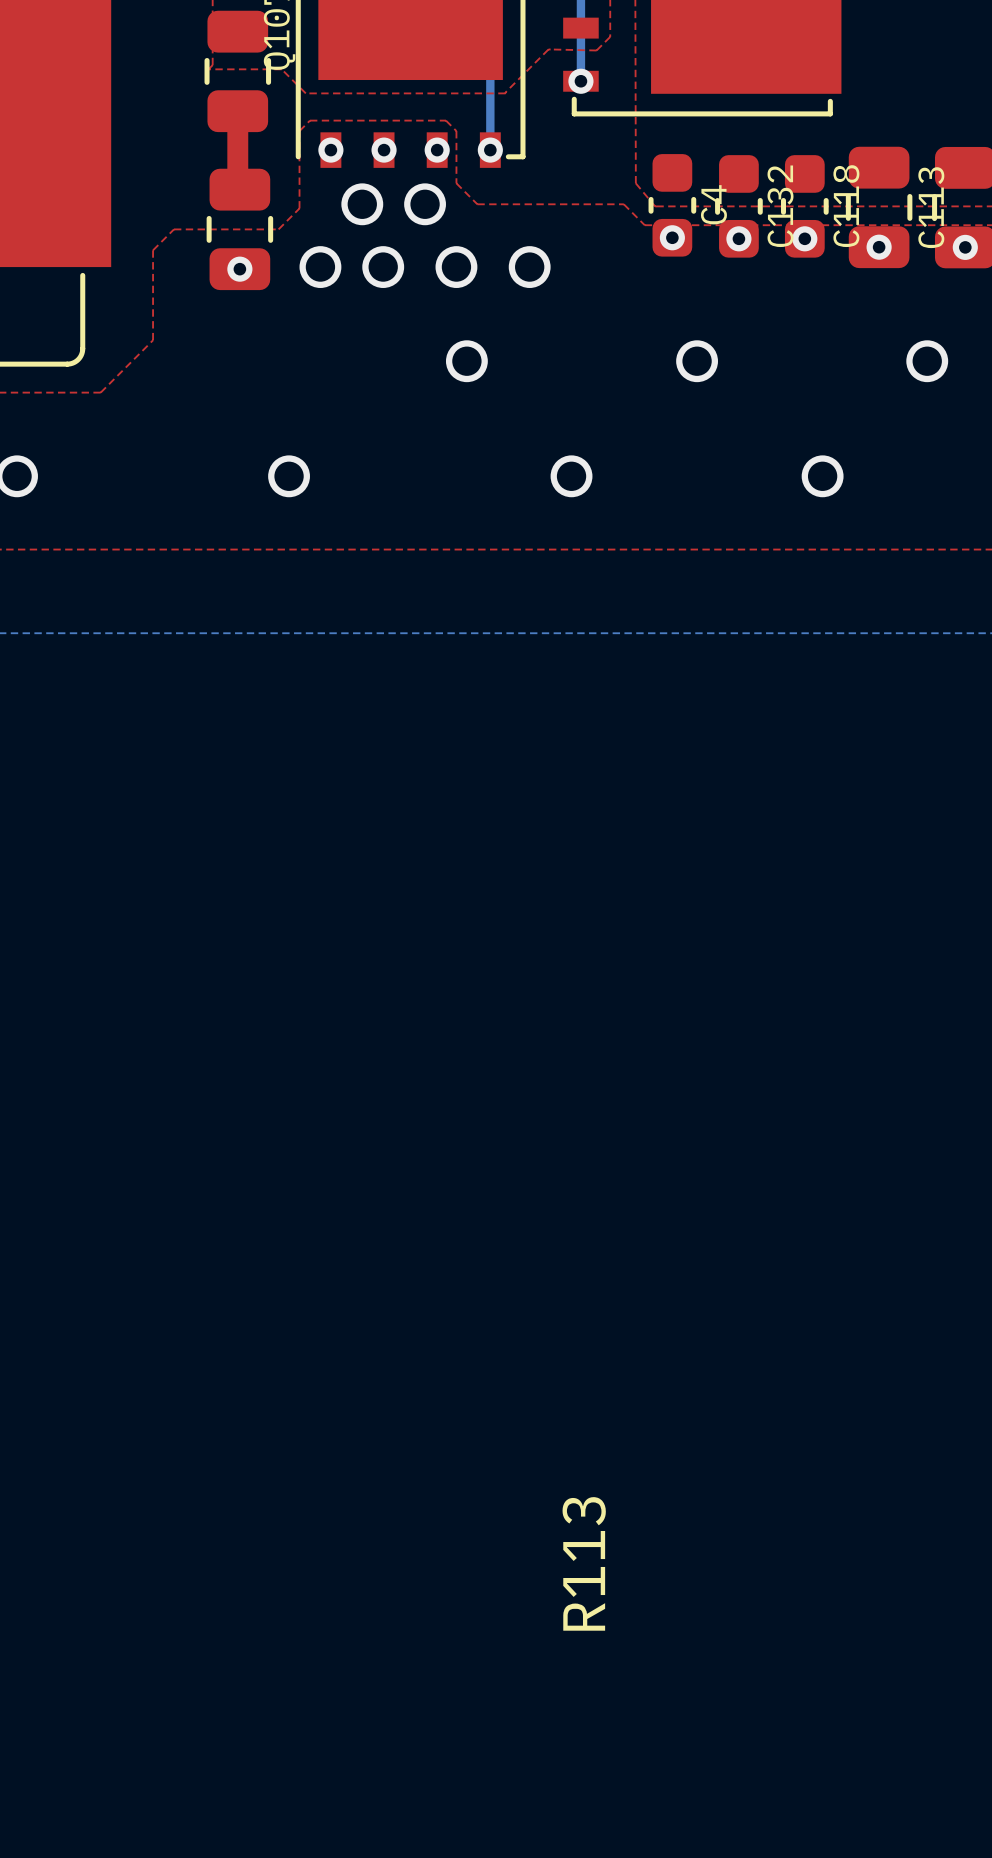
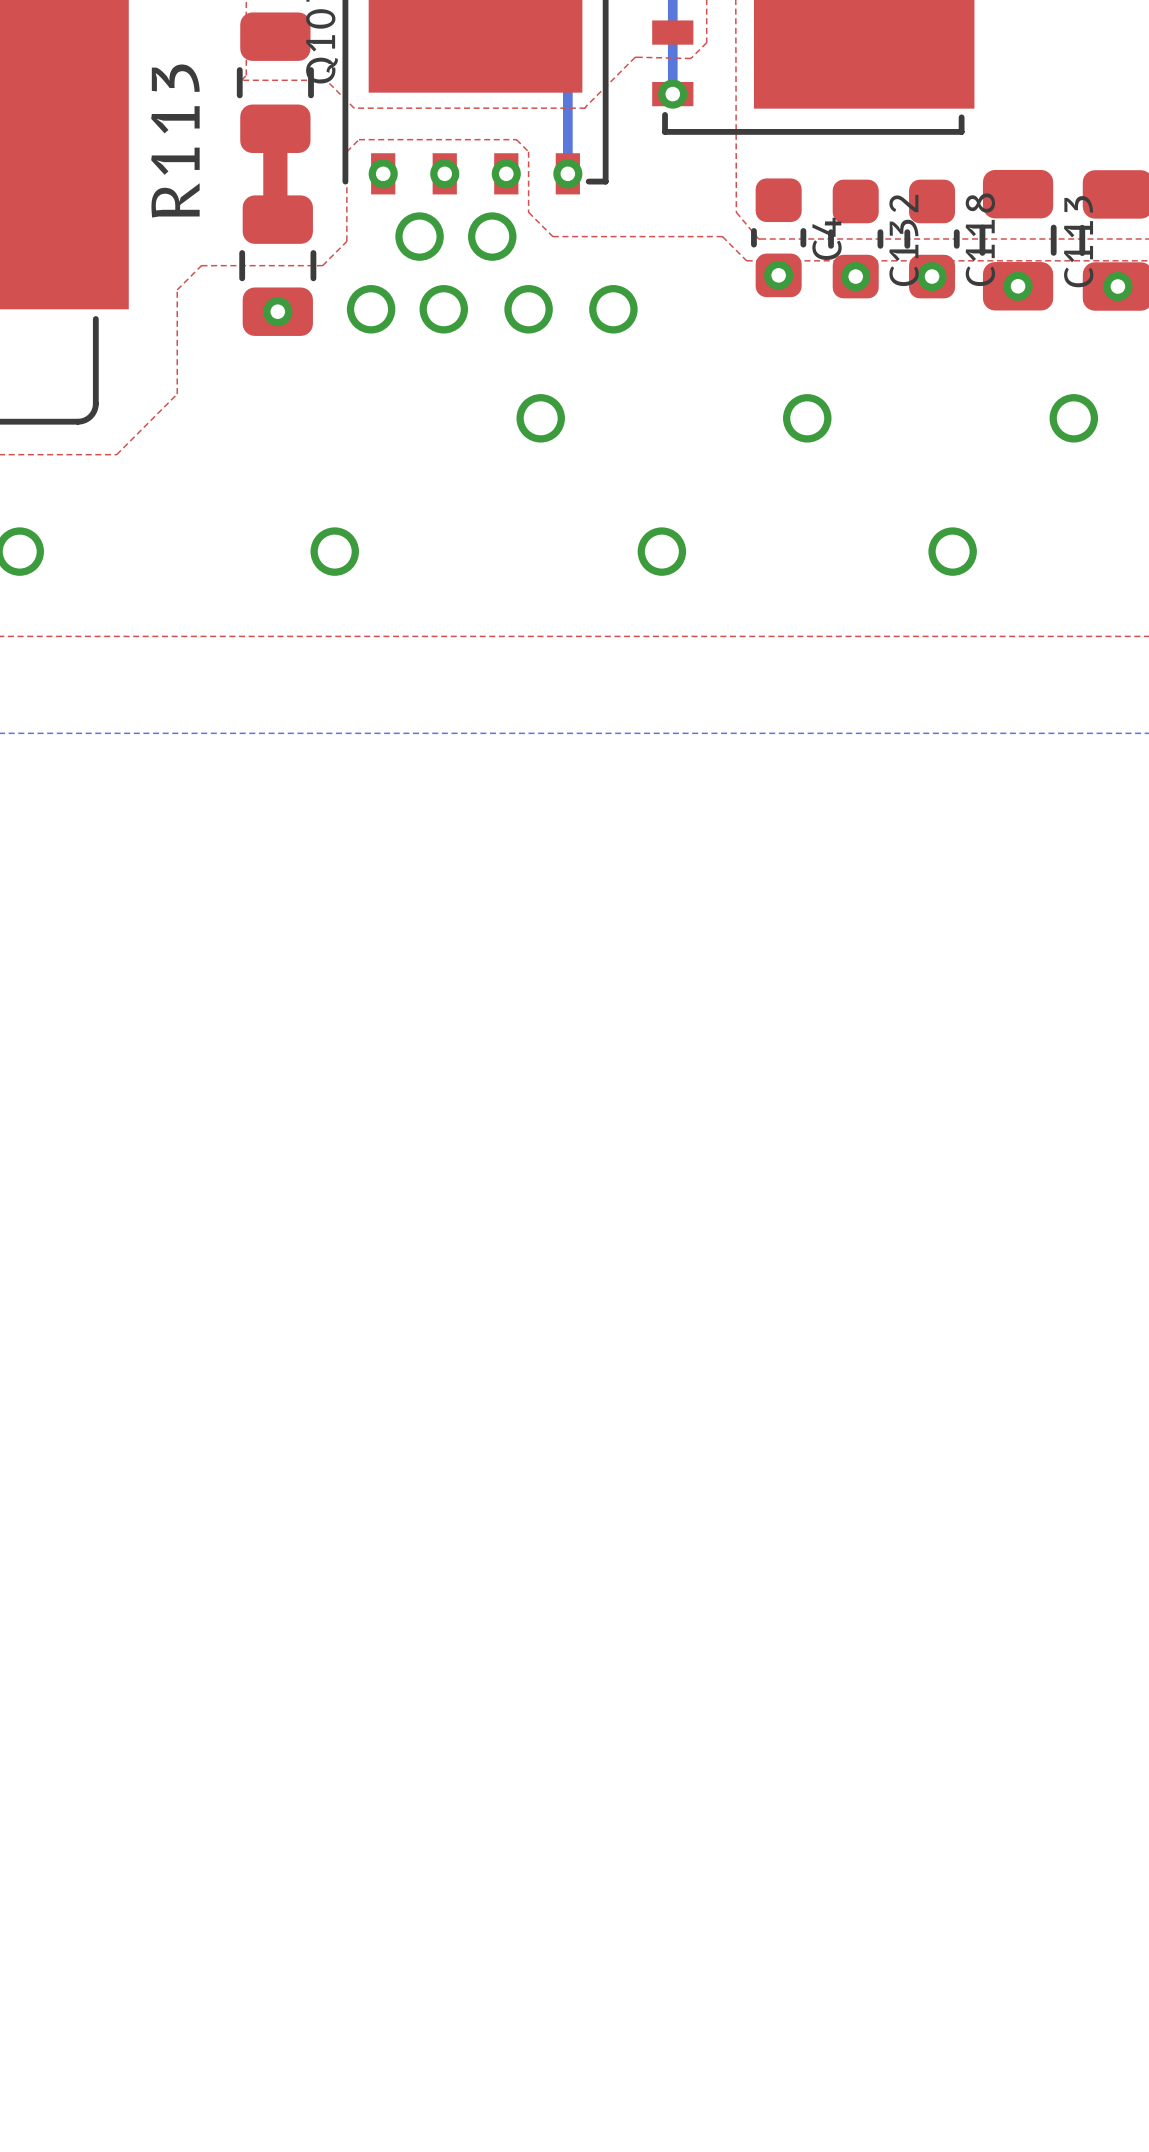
R113 name position: R113 (584, 1563) -> R113 (175, 141)

